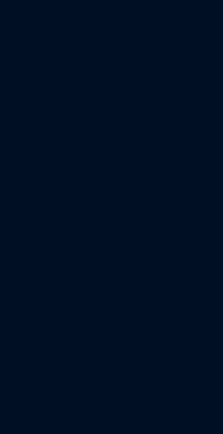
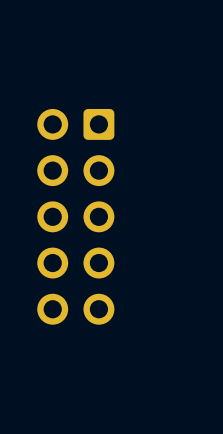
part: none -> (75, 216)

